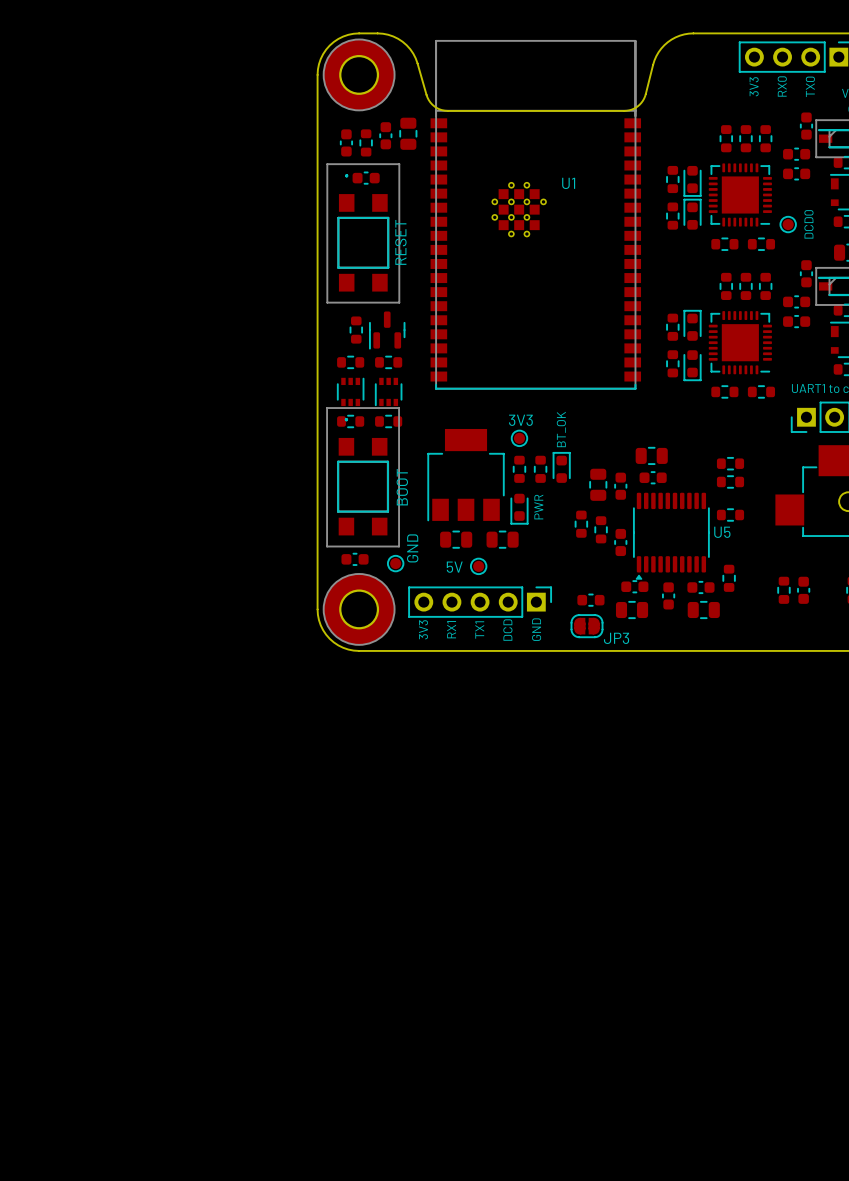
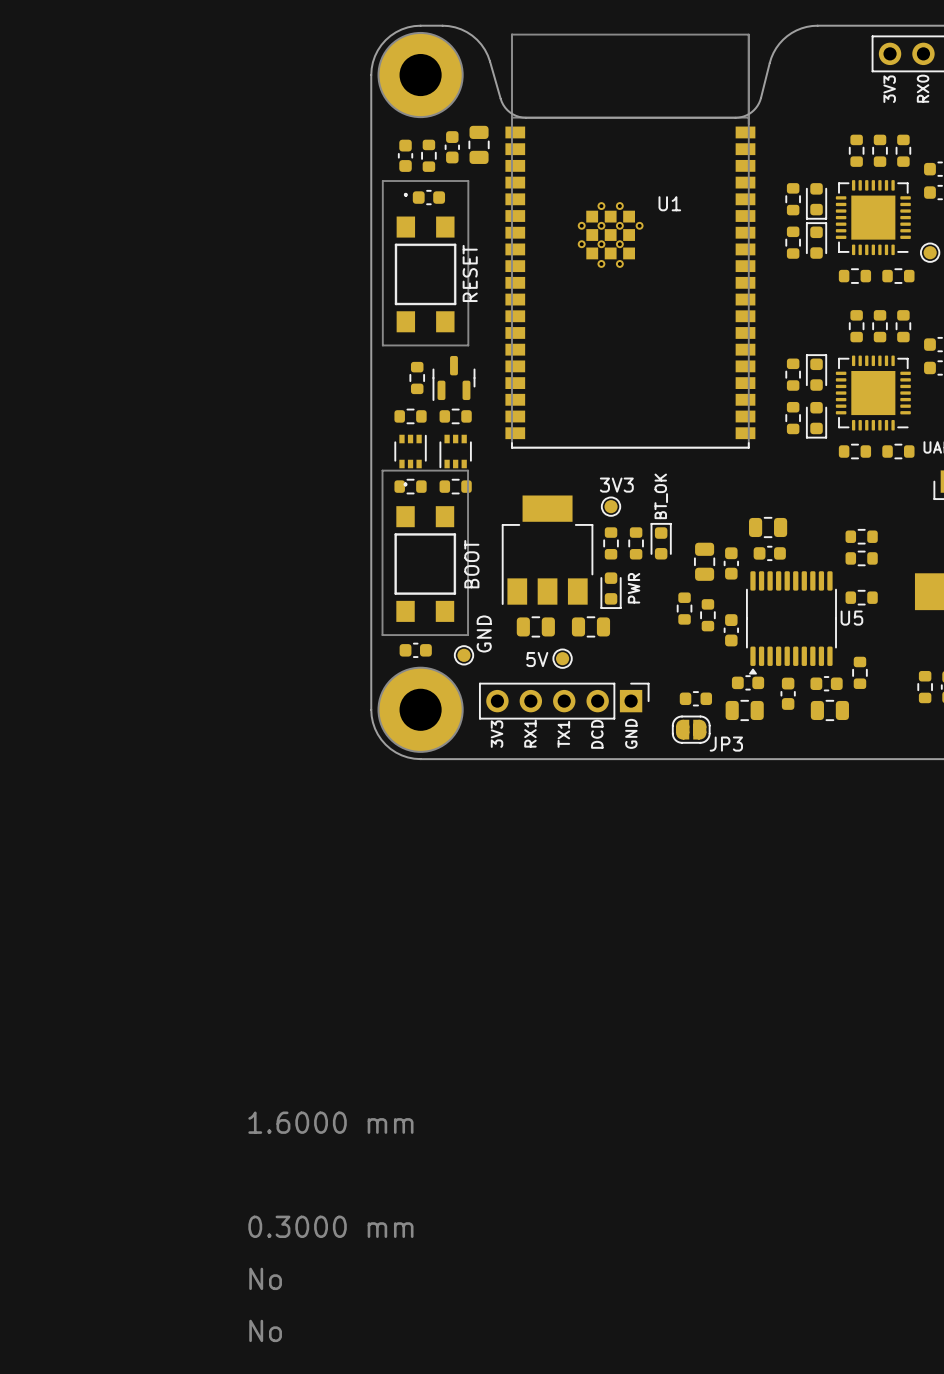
text: none -> 1.6000 mm (330, 1122)
text: none -> 0.3000 mm (330, 1226)
text: none -> No (265, 1278)
text: none -> No (265, 1330)

